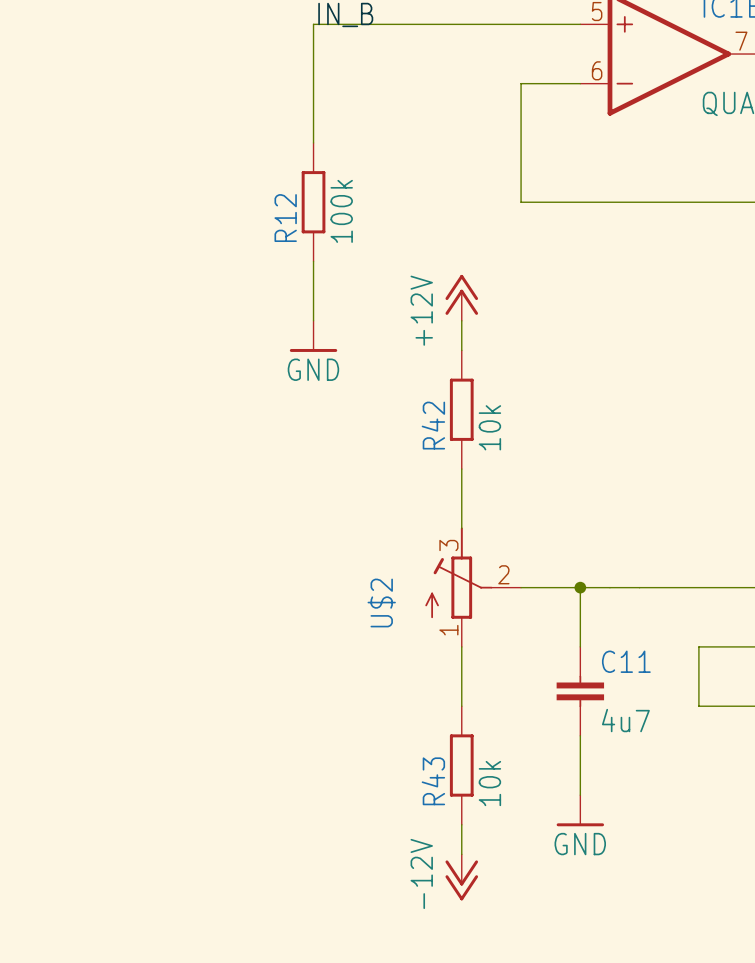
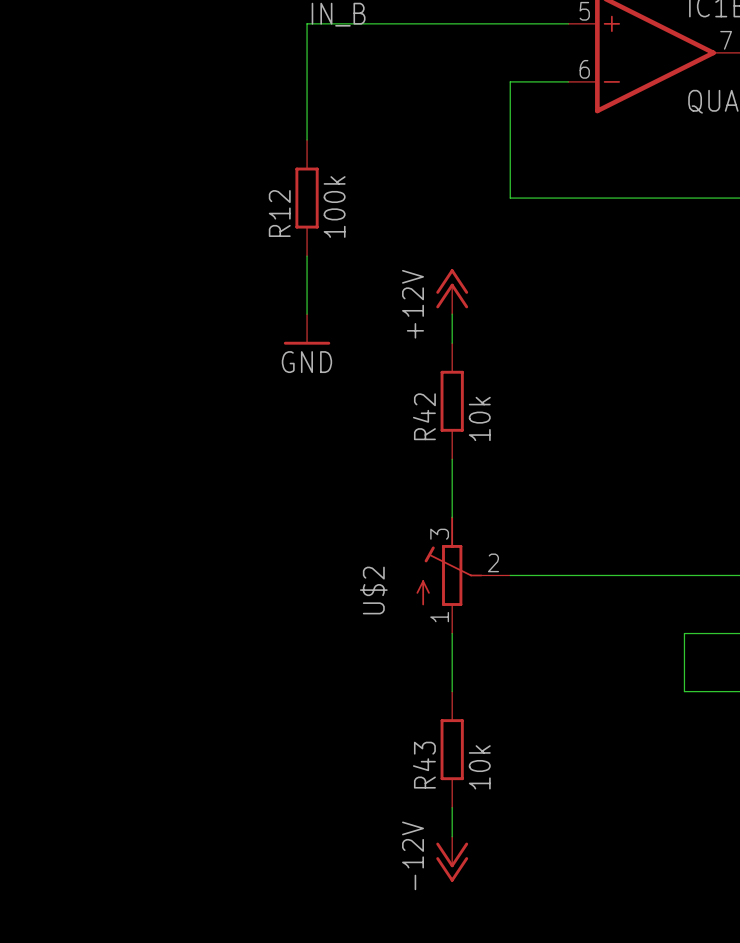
wire: (580, 587) (580, 646) -> none
junction: (580, 587) -> none
C11: 4u7 (580, 691) -> none
wire: (580, 735) (580, 795) -> none
power symbol: GND (580, 810) -> none

